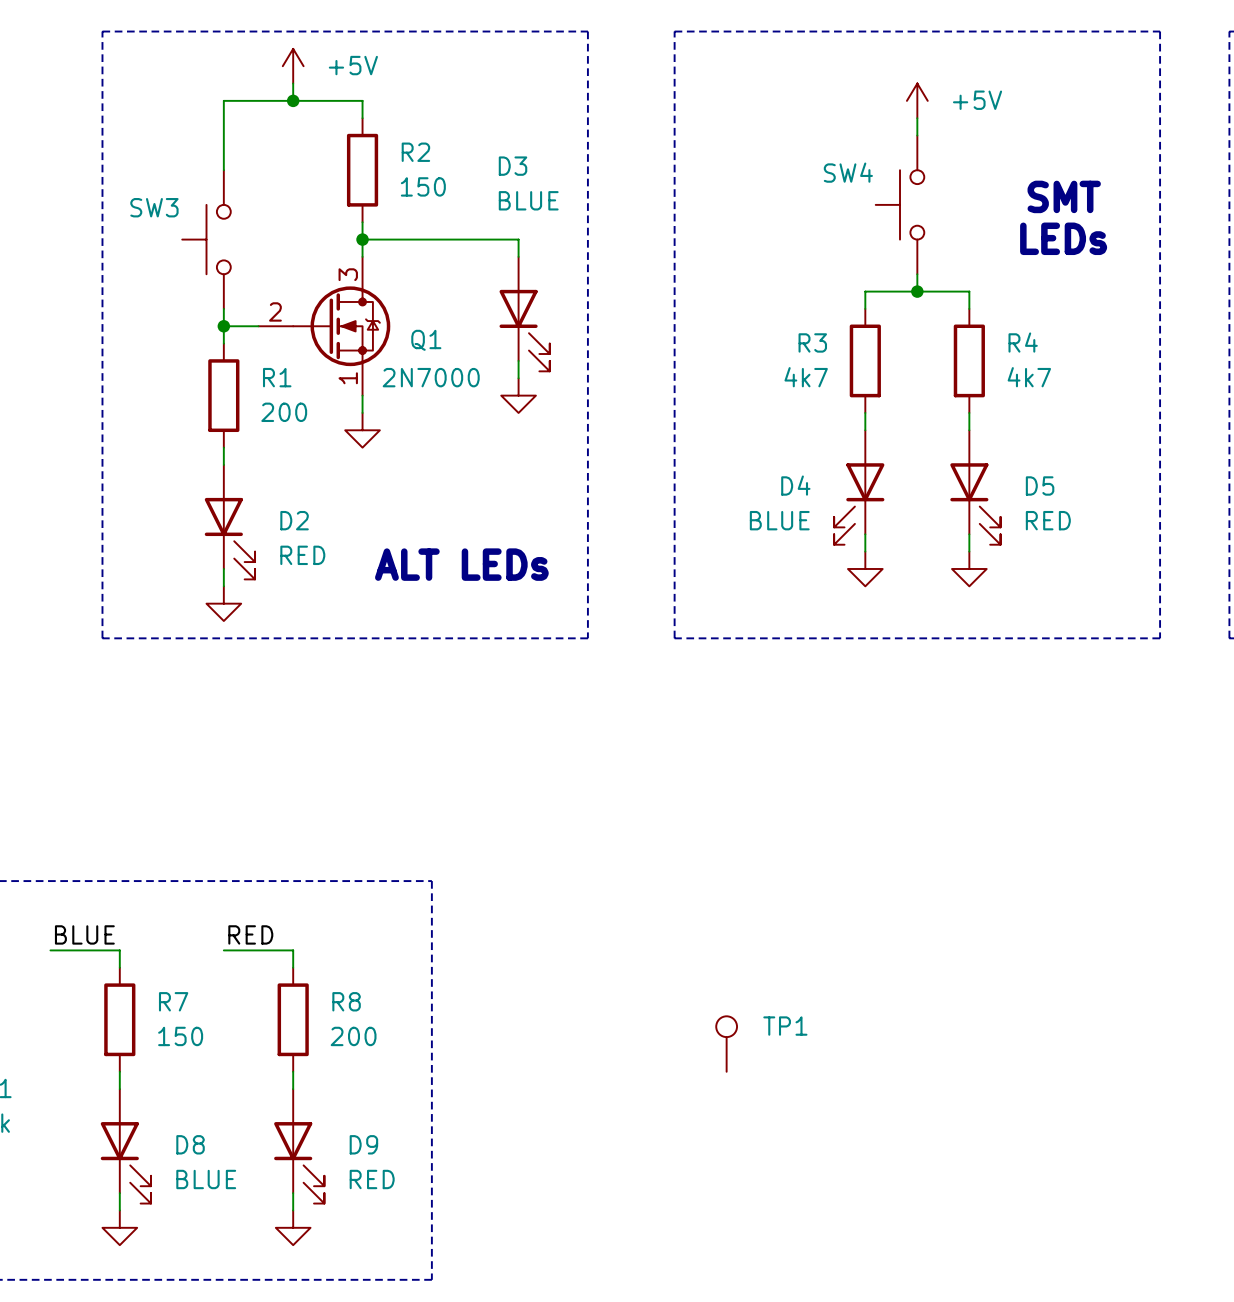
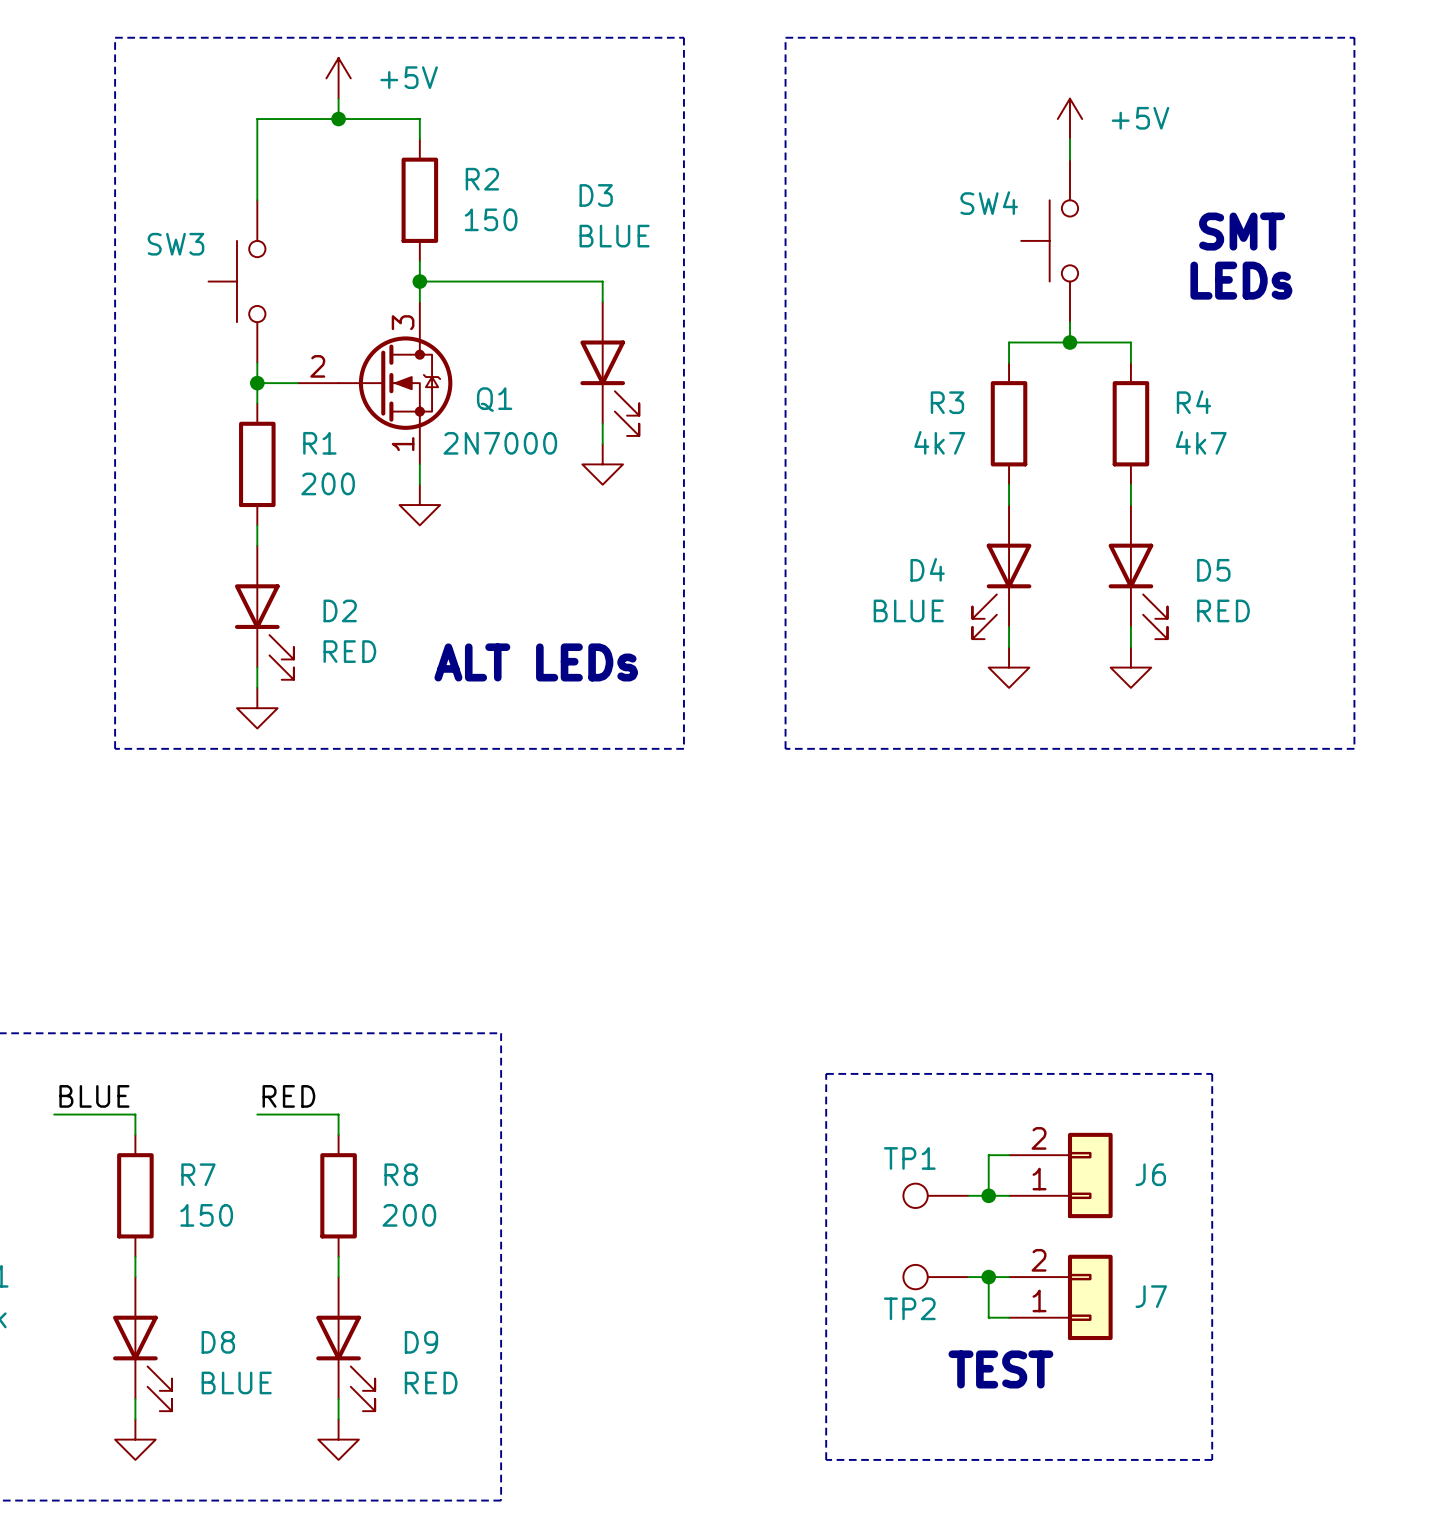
line: none -> (826, 1073) (1212, 1073) (1212, 1459) (826, 1459) (826, 1073)
wire: none -> (1009, 1155) (988, 1155) (988, 1195)
J6: none -> (1060, 1175)
wire: none -> (968, 1195) (1009, 1195)
junction: none -> (988, 1195)
TP1 rotation: 0° (726, 1026) -> 90° counterclockwise (915, 1195)
TP1 name position: TP1 (785, 1026) -> TP1 (909, 1158)
TP1 position: (726, 1044) -> (935, 1195)
TP2: none -> (935, 1277)
wire: none -> (968, 1277) (1009, 1277)
wire: none -> (988, 1277) (988, 1317) (1009, 1317)
junction: none -> (988, 1277)
J7: none -> (1060, 1297)
text: none -> TEST (1000, 1369)

